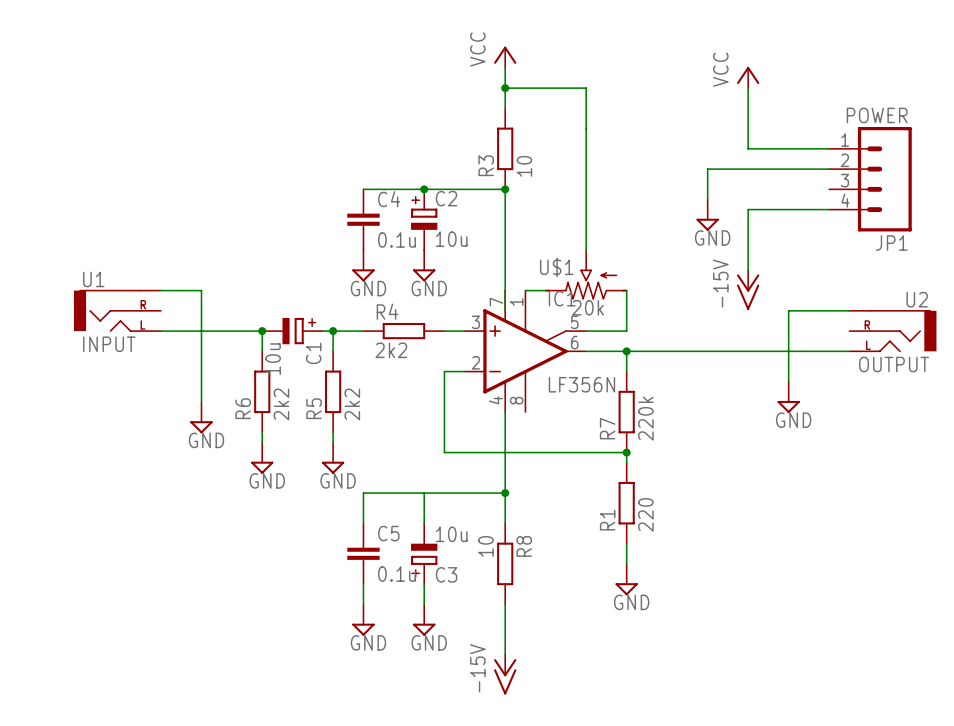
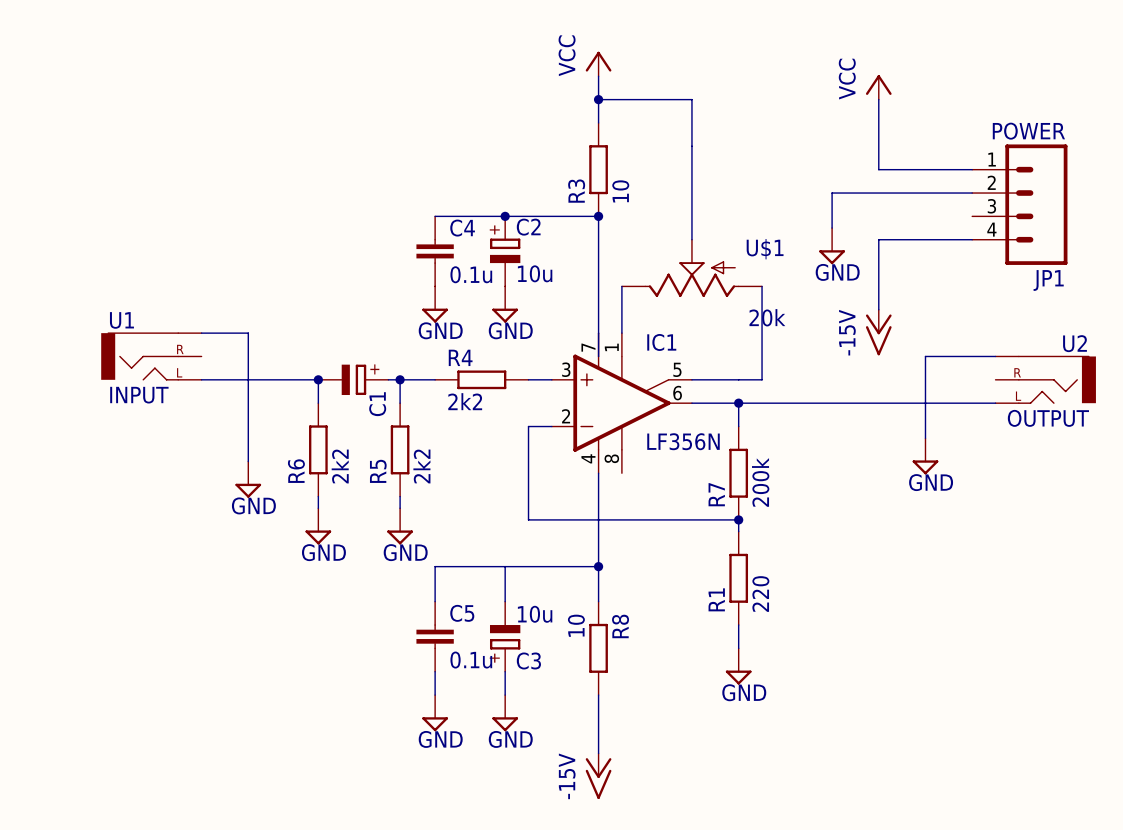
U$1 symbol: [545, 250, 628, 300] -> [621, 239, 763, 297]
U$1 name position: U$1 (556, 267) -> U$1 (765, 249)
wire: (525, 290) (545, 290) -> (621, 333) (621, 286)
wire: (626, 290) (626, 331) -> (762, 286) (762, 379) (738, 379)
U$1 value position: 20k (588, 307) -> 20k (767, 317)
C1 value: 10u (273, 359) -> none
R7 value: 220k (645, 418) -> 200k (760, 482)

